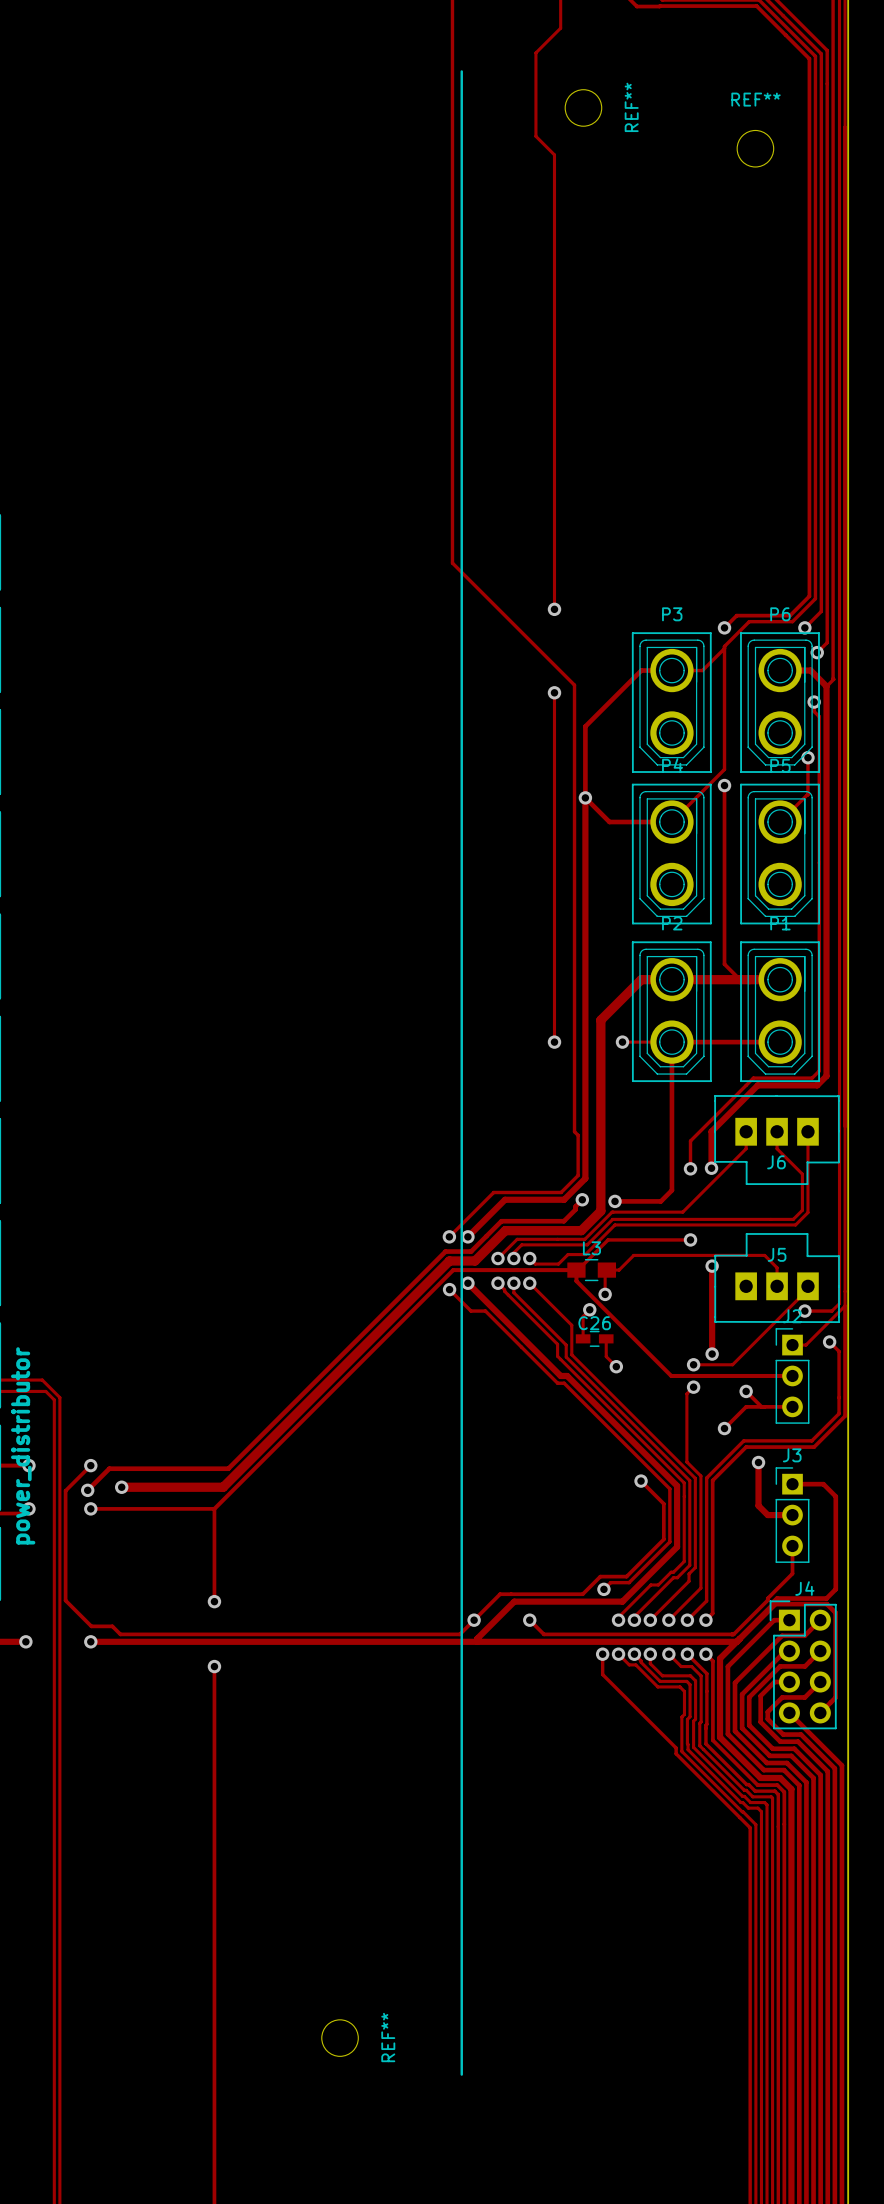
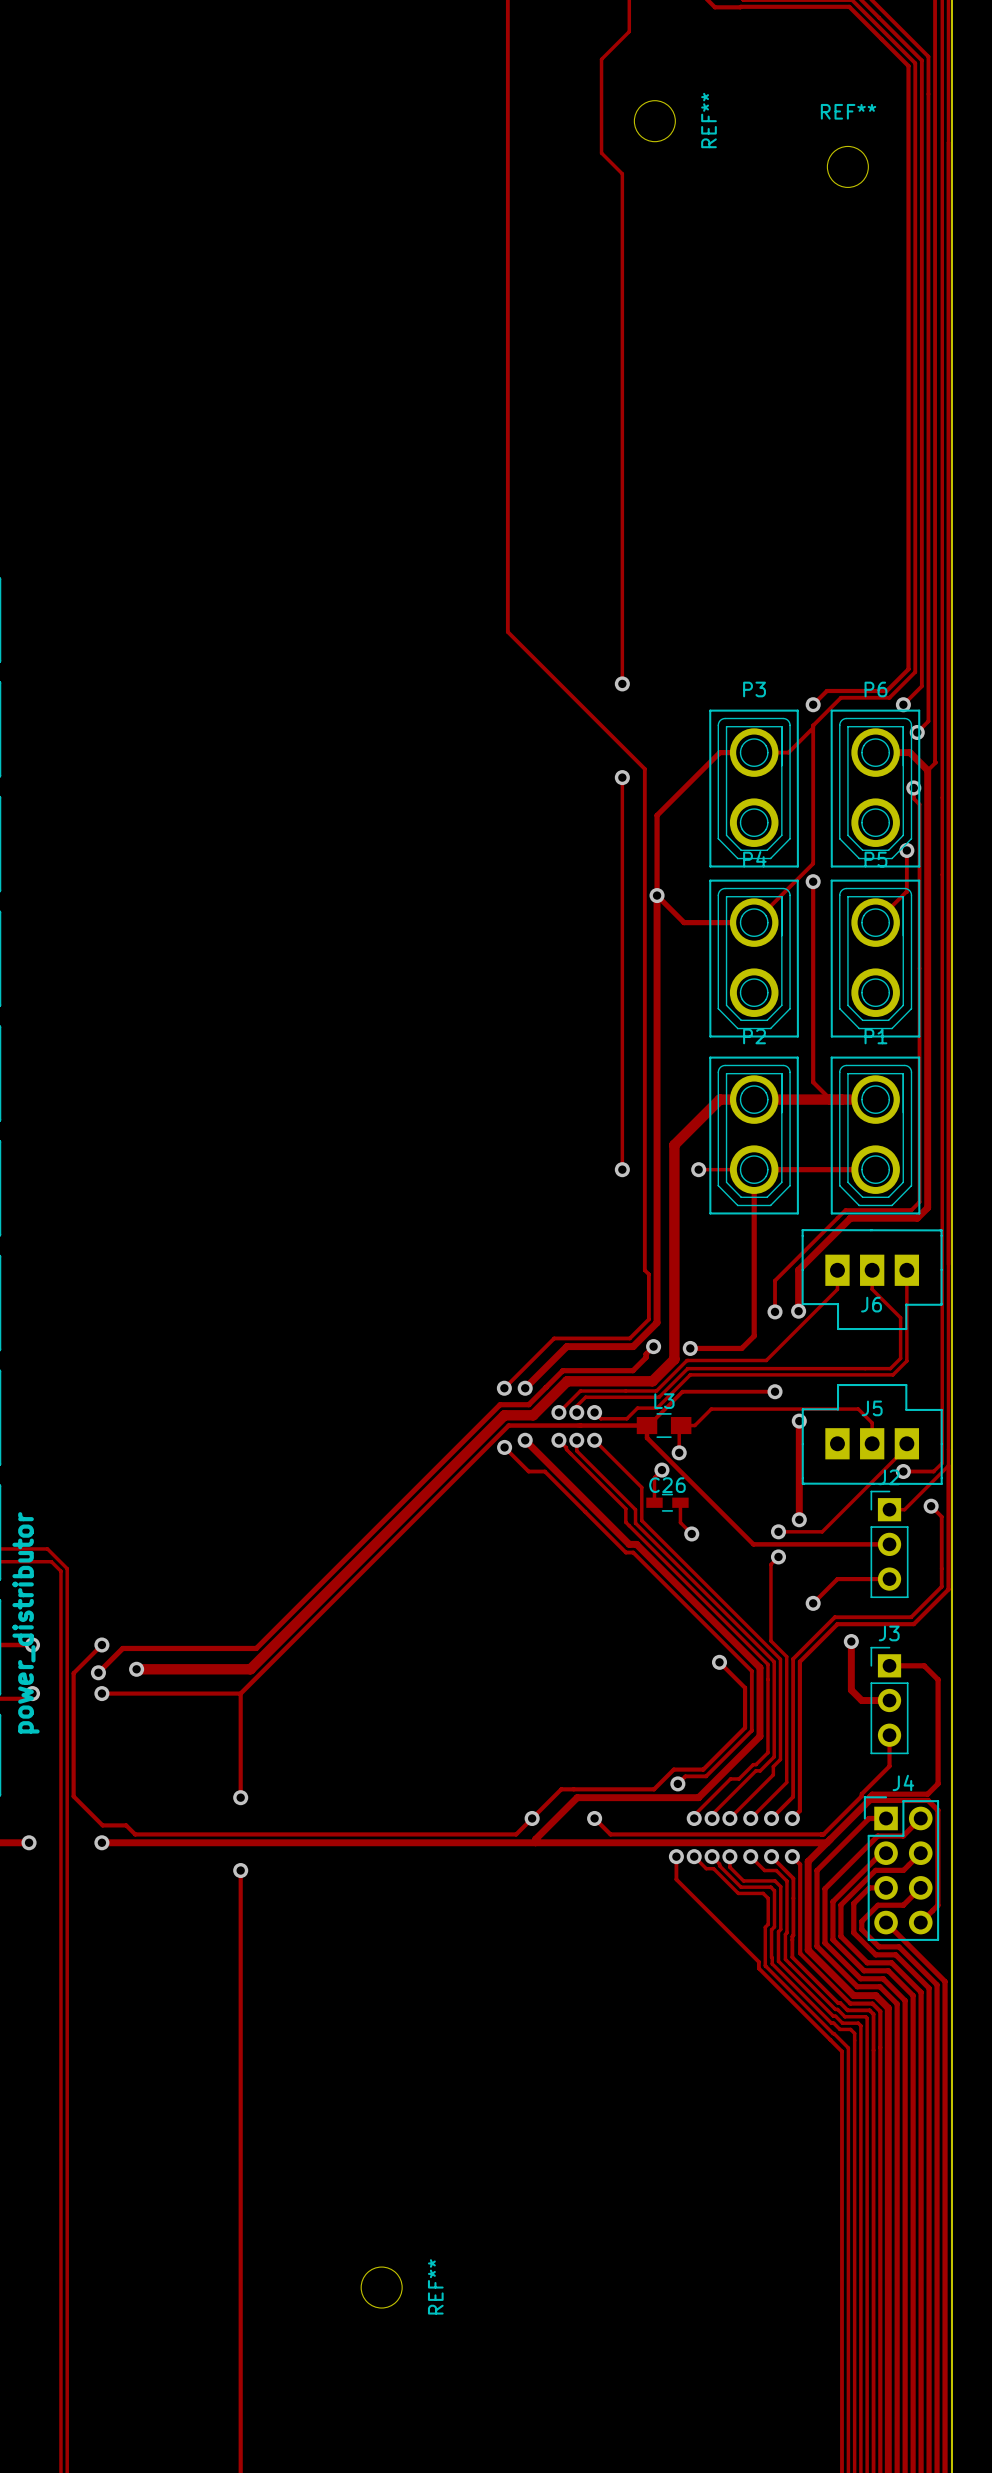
line: (461, 71) (461, 2074) -> none
track: (746, 1391) (761, 1406) -> none
via: (746, 1391) -> none

